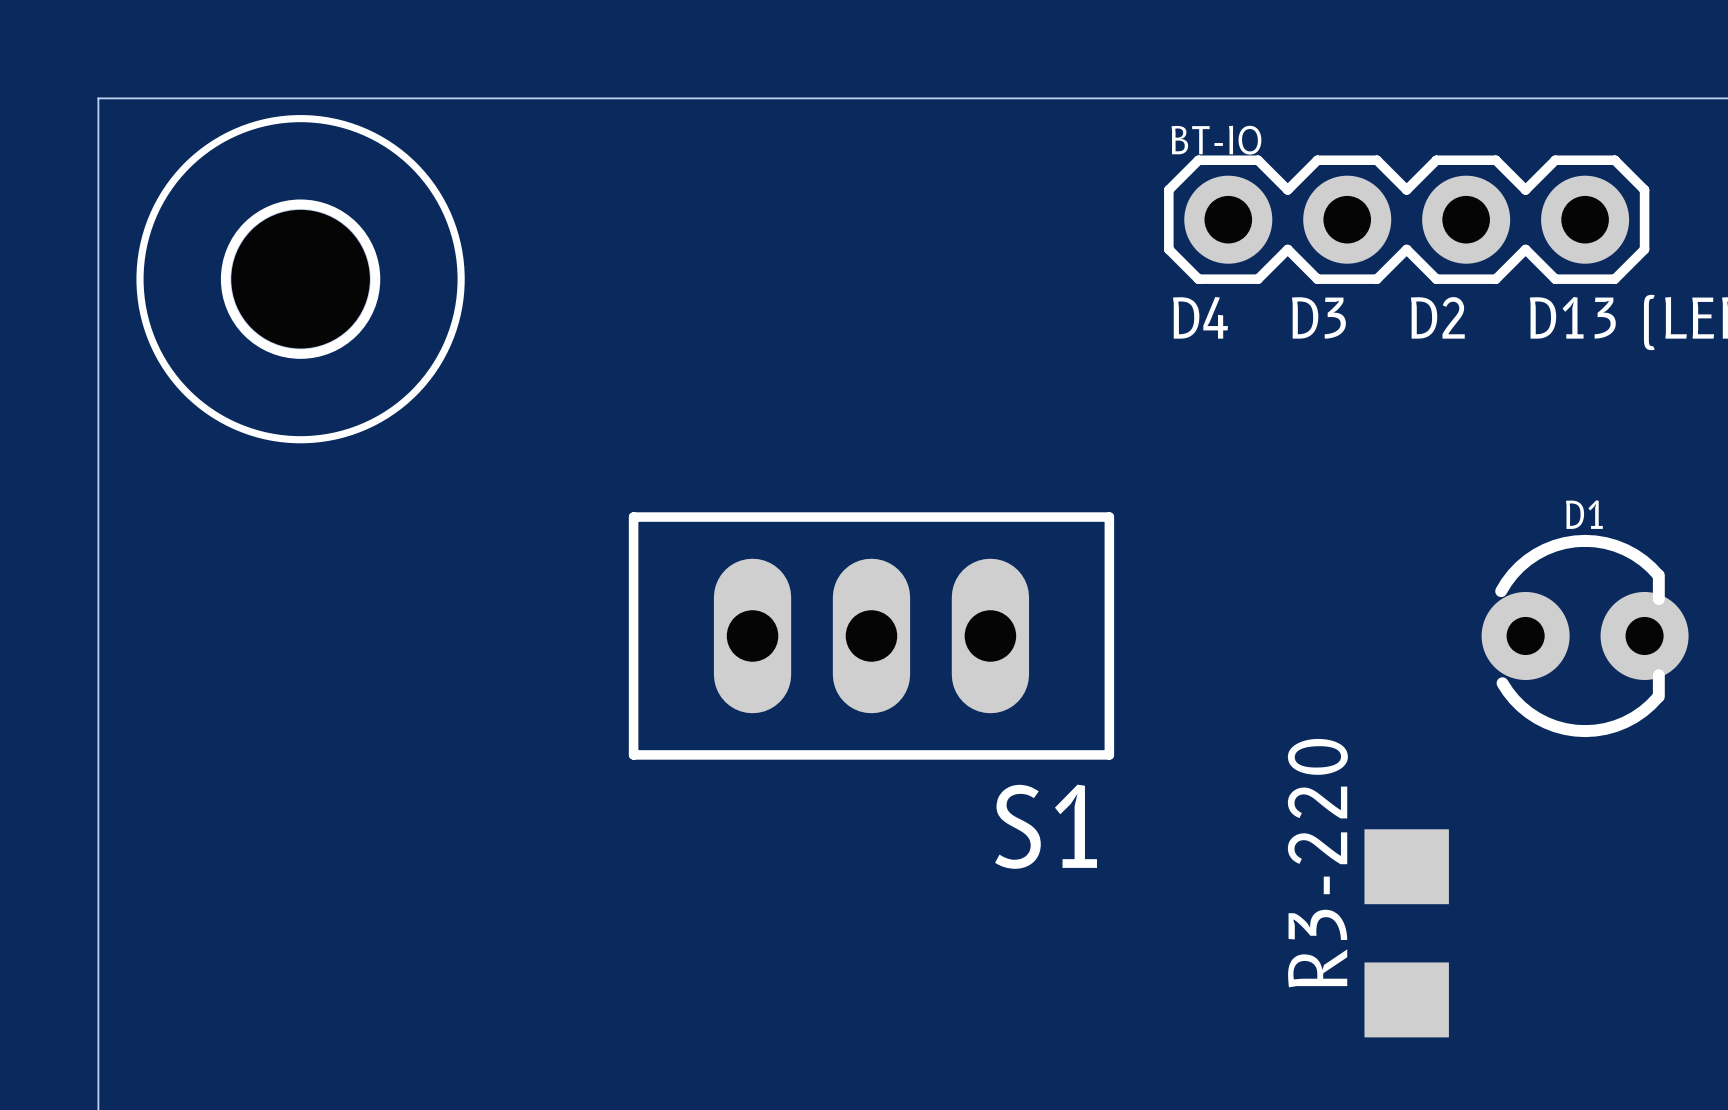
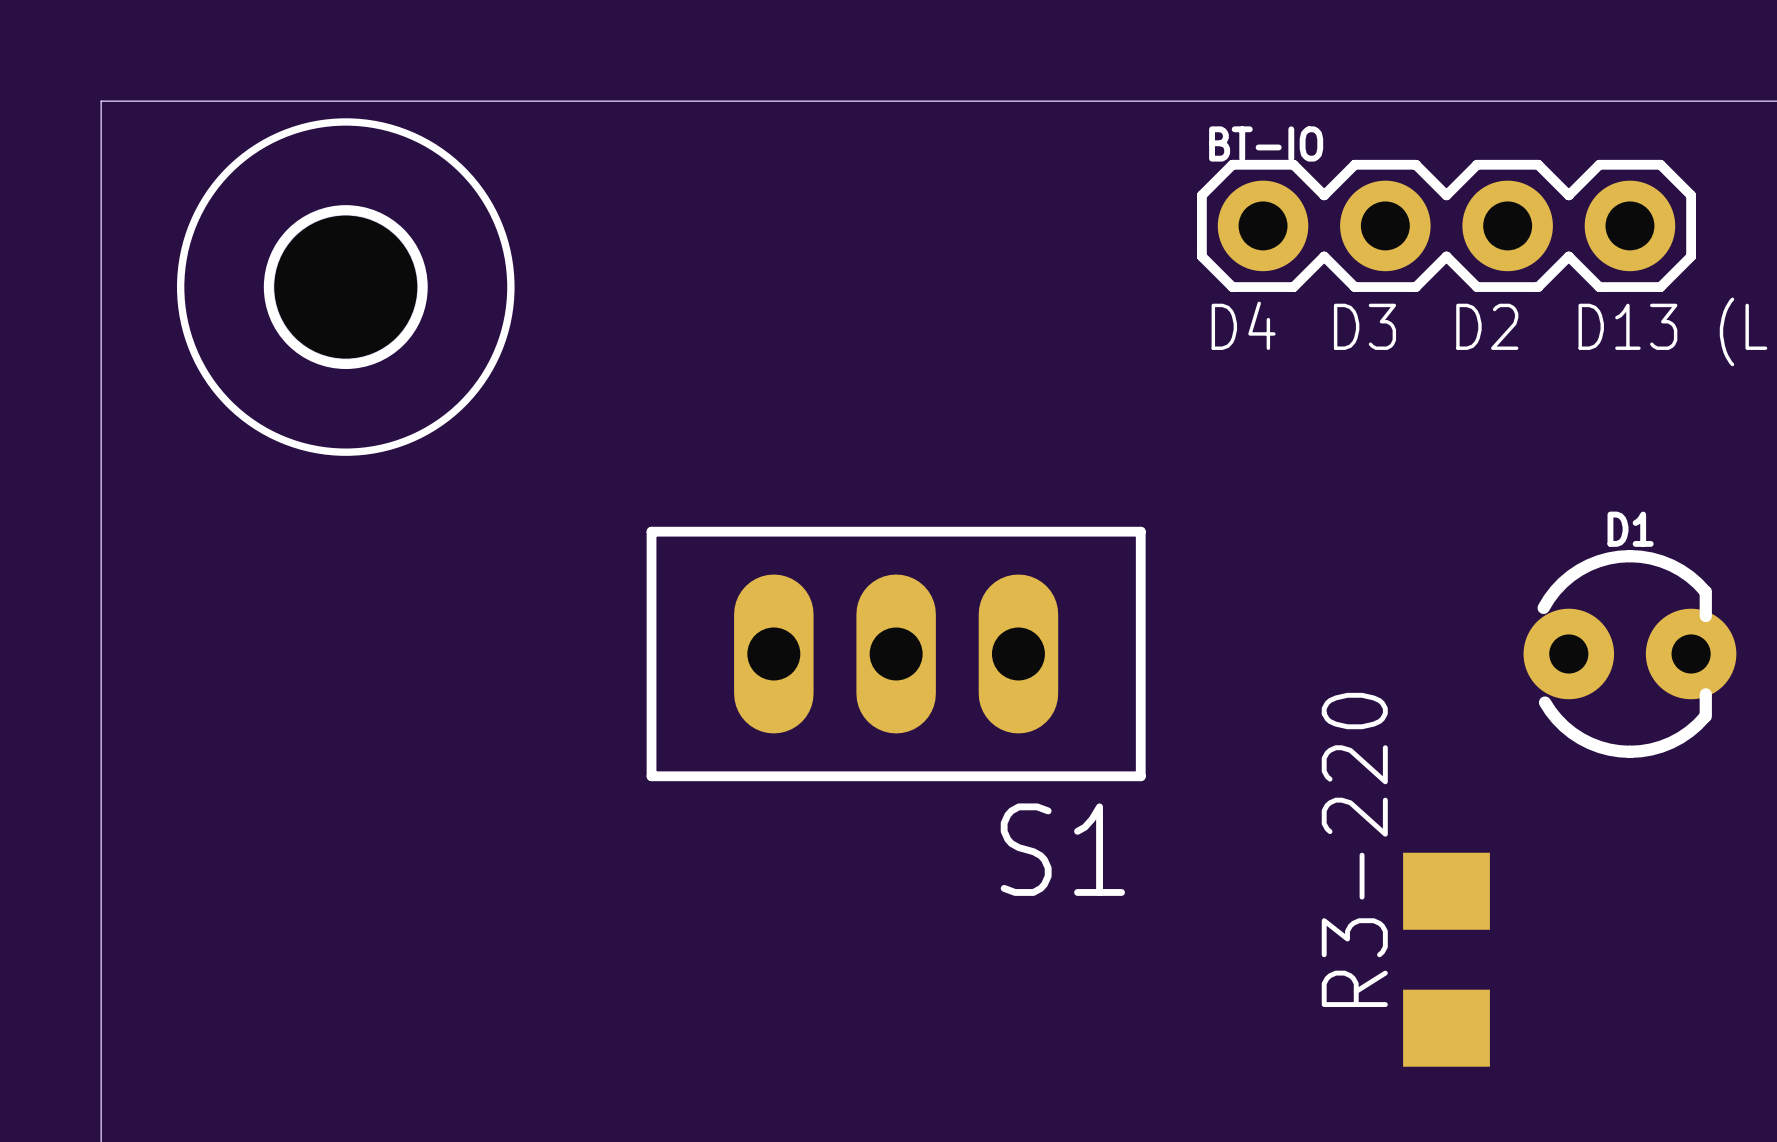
part position: (300, 279) -> (345, 287)

